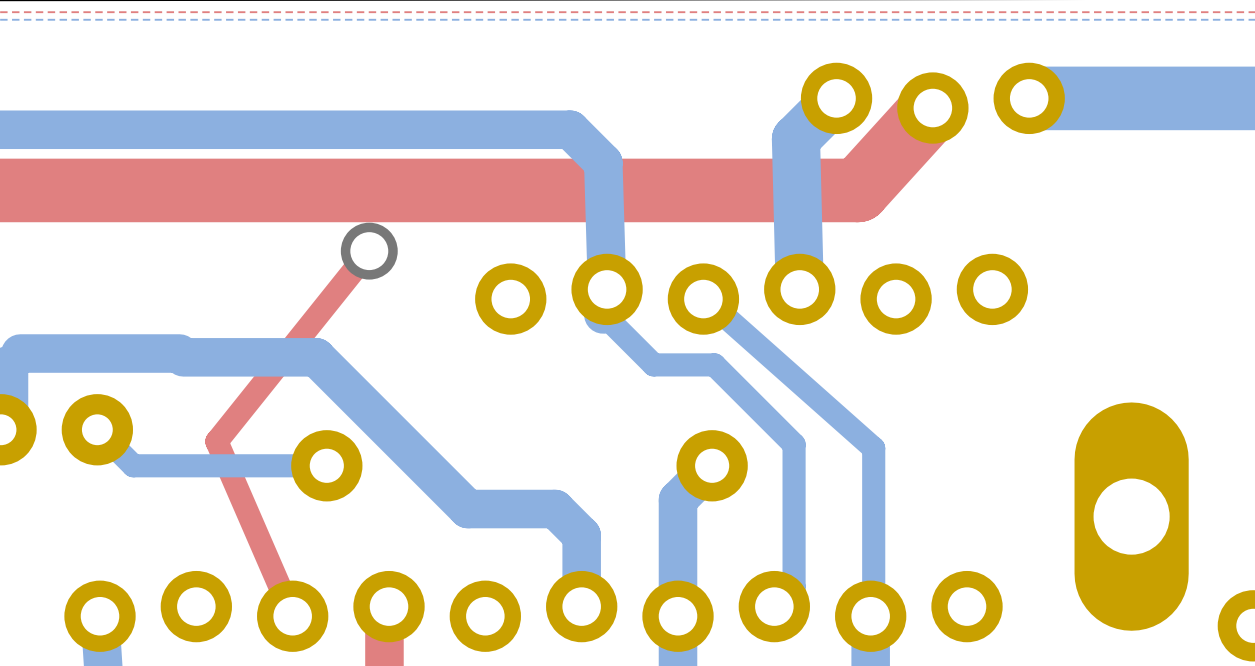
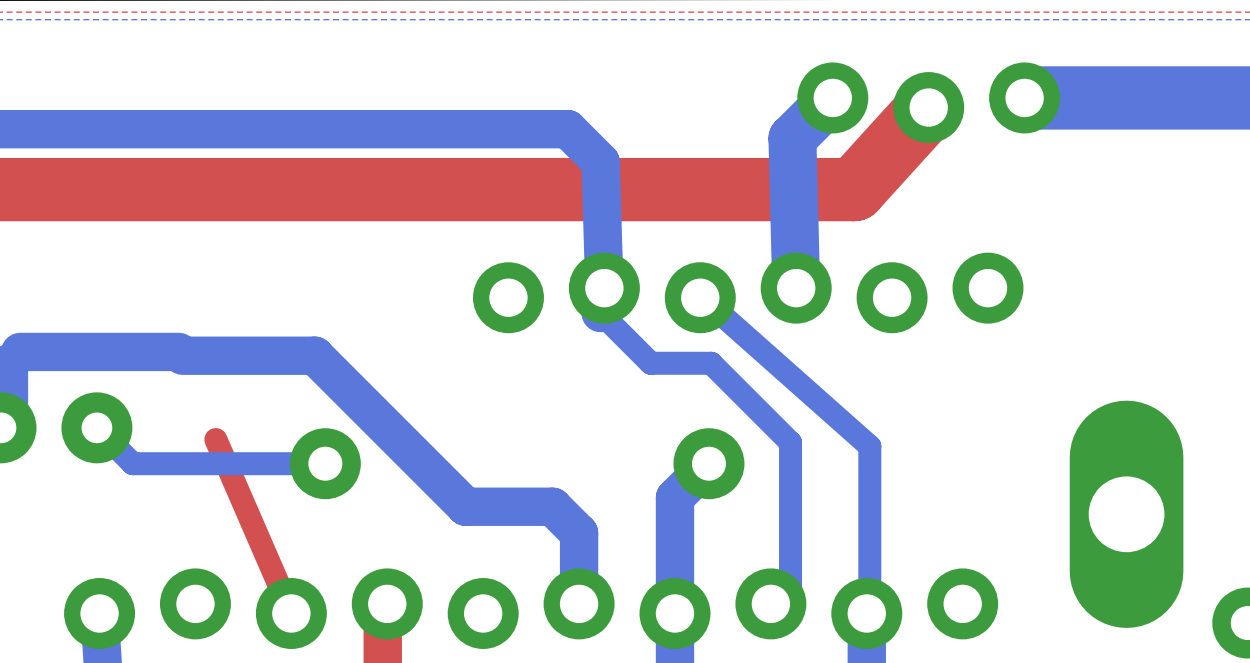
top track: (369, 251) (216, 441) -> none
via: (369, 251) -> none

